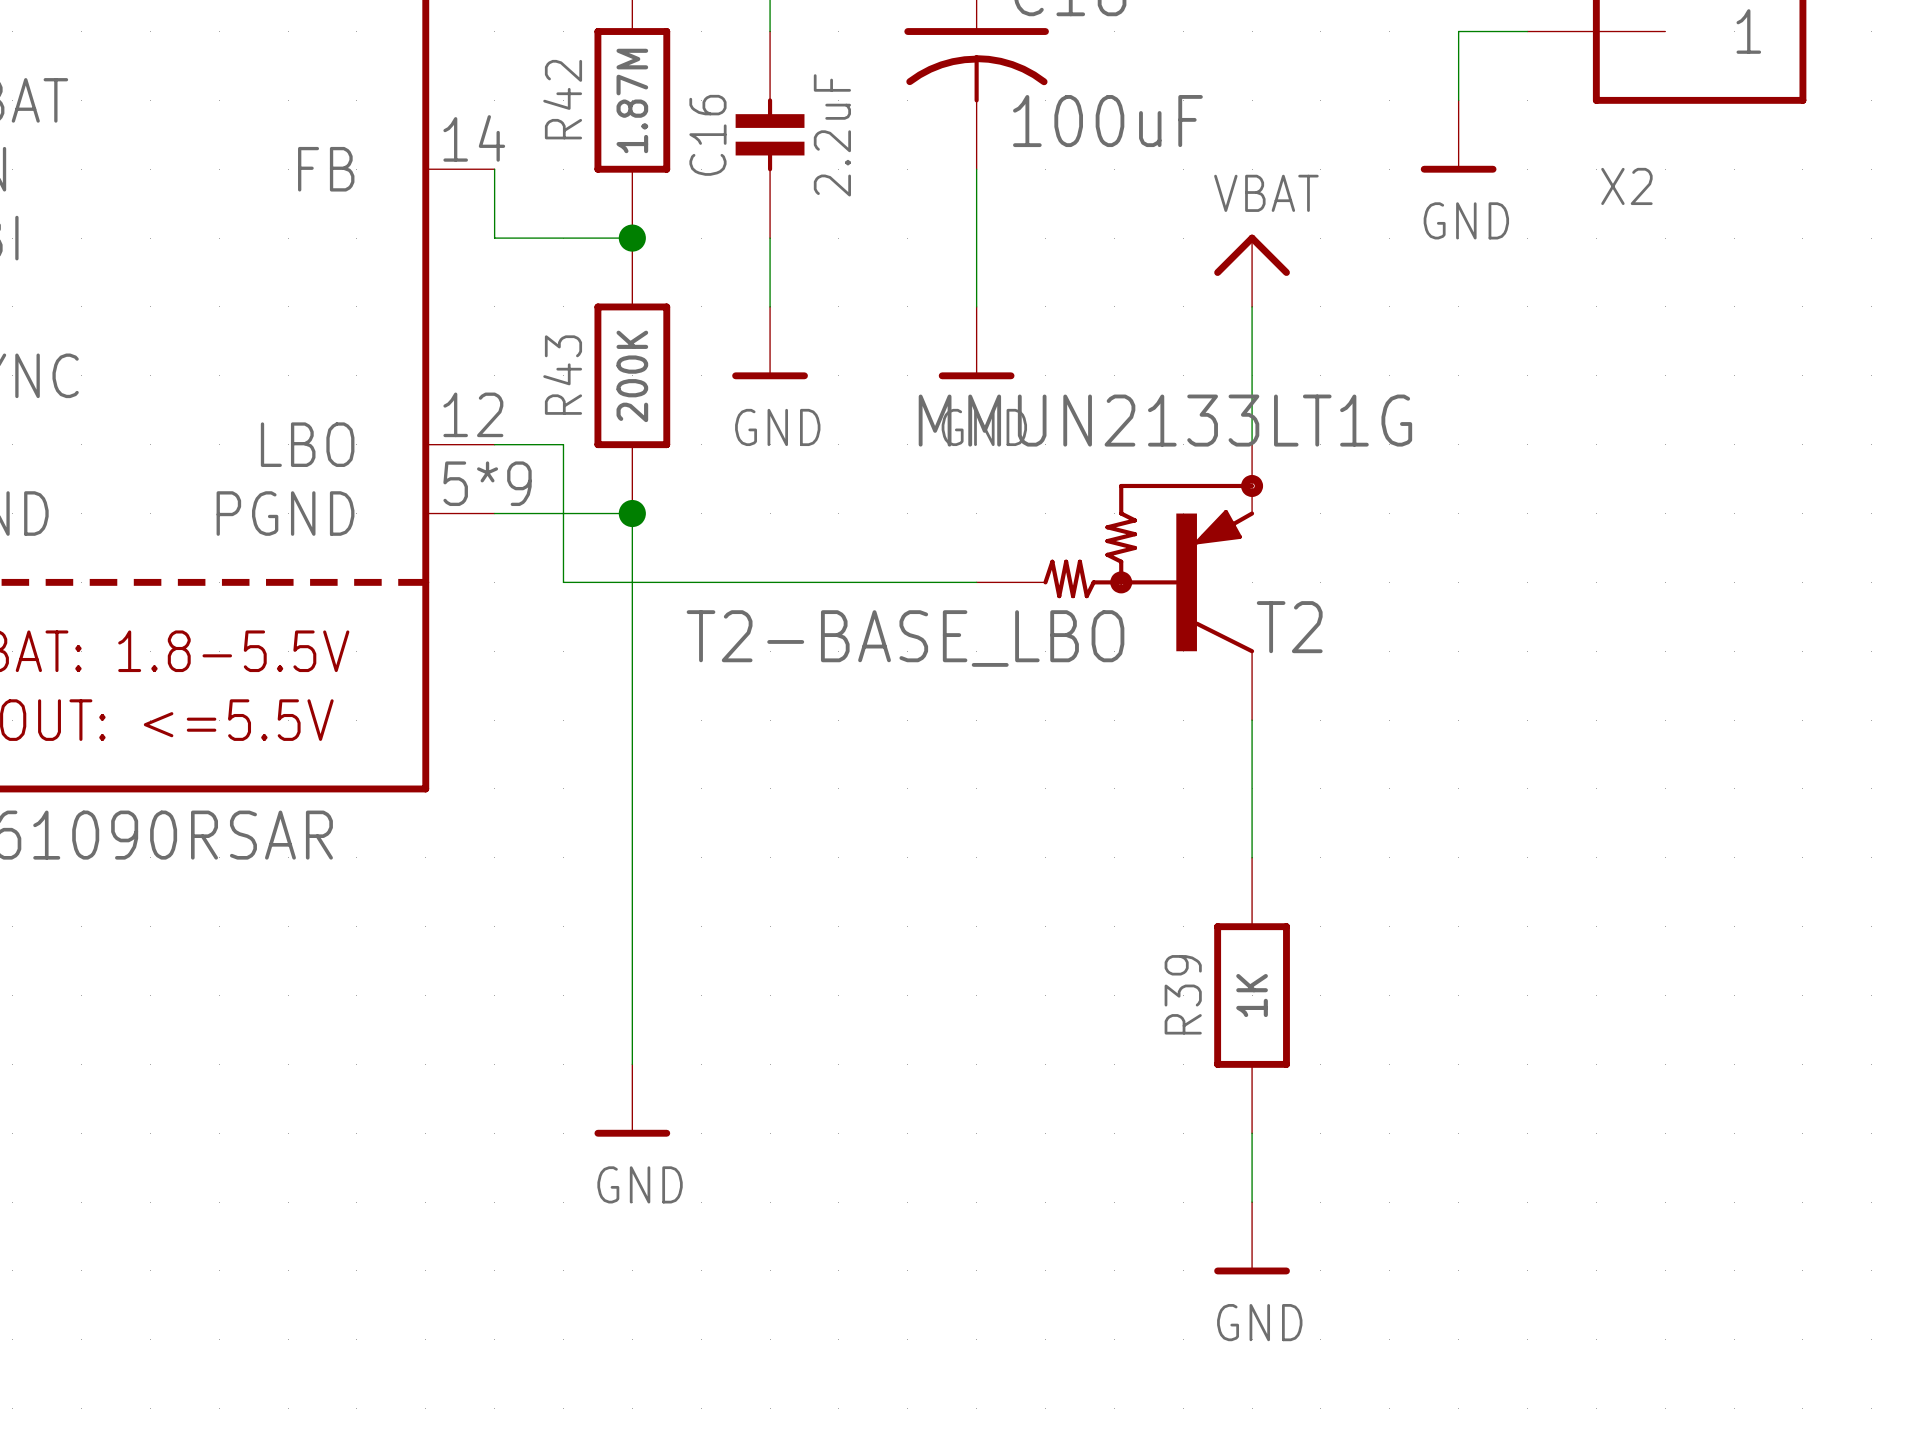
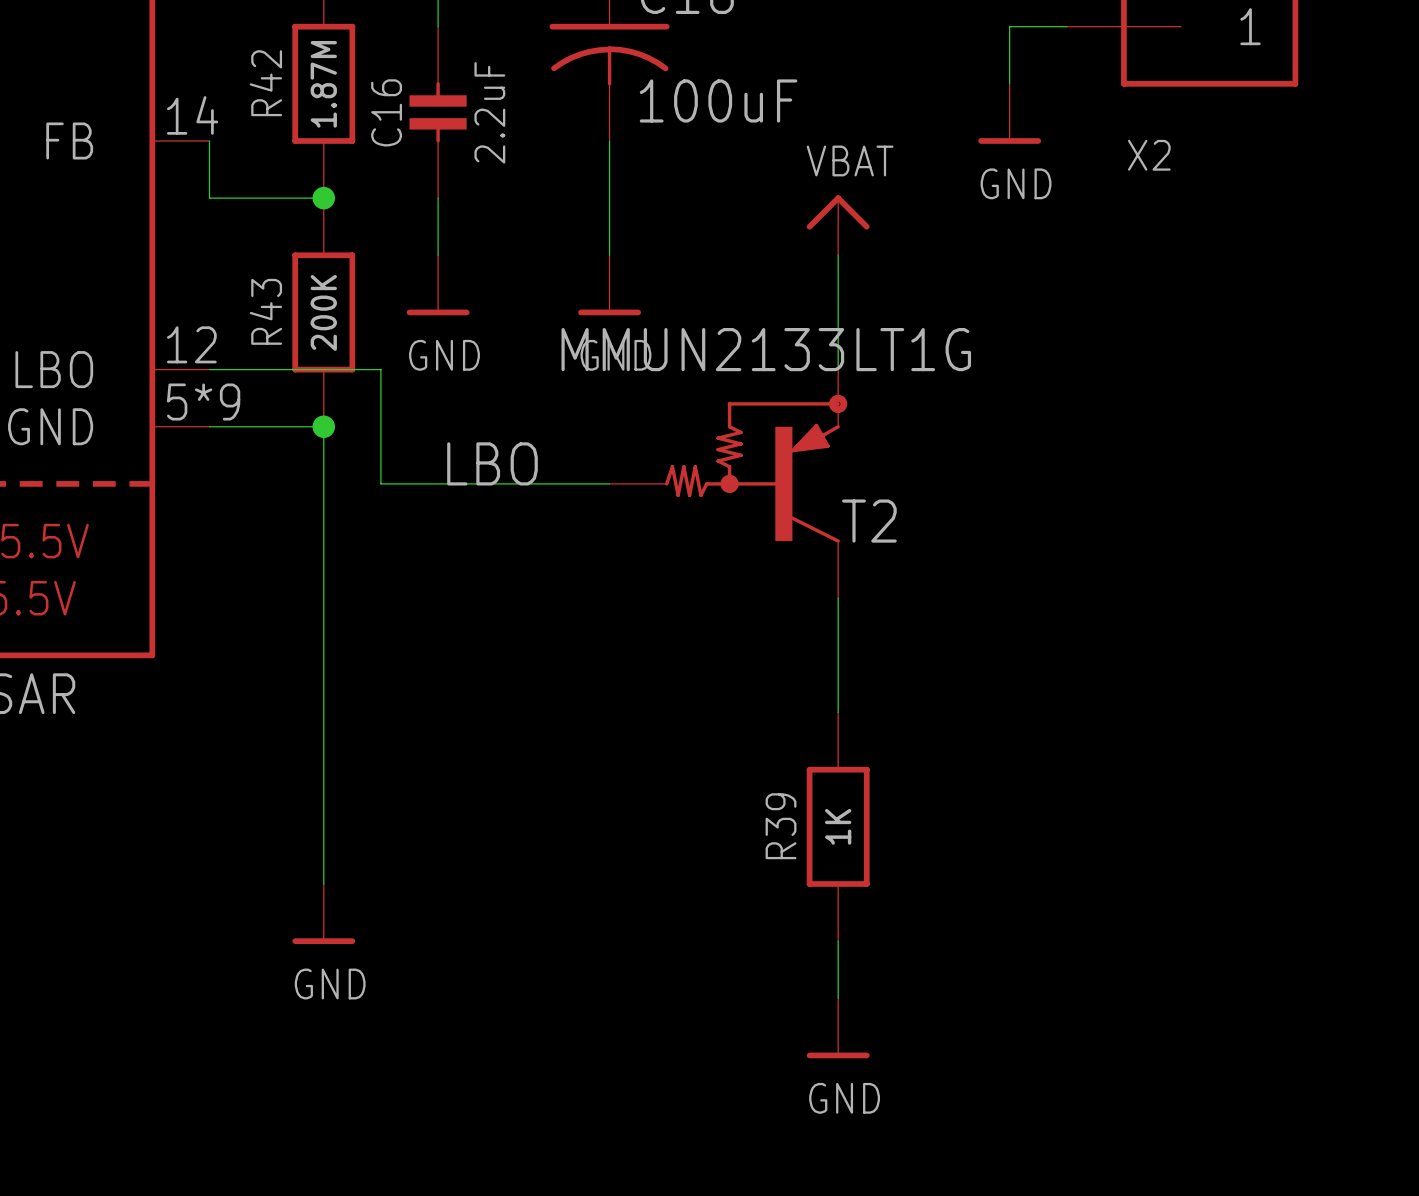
wire: (563, 444) (563, 582) (701, 582) -> (266, 369) (380, 369) (380, 483)
label: none -> LBO (492, 463)
label: T2-BASE_LBO (905, 638) -> none

